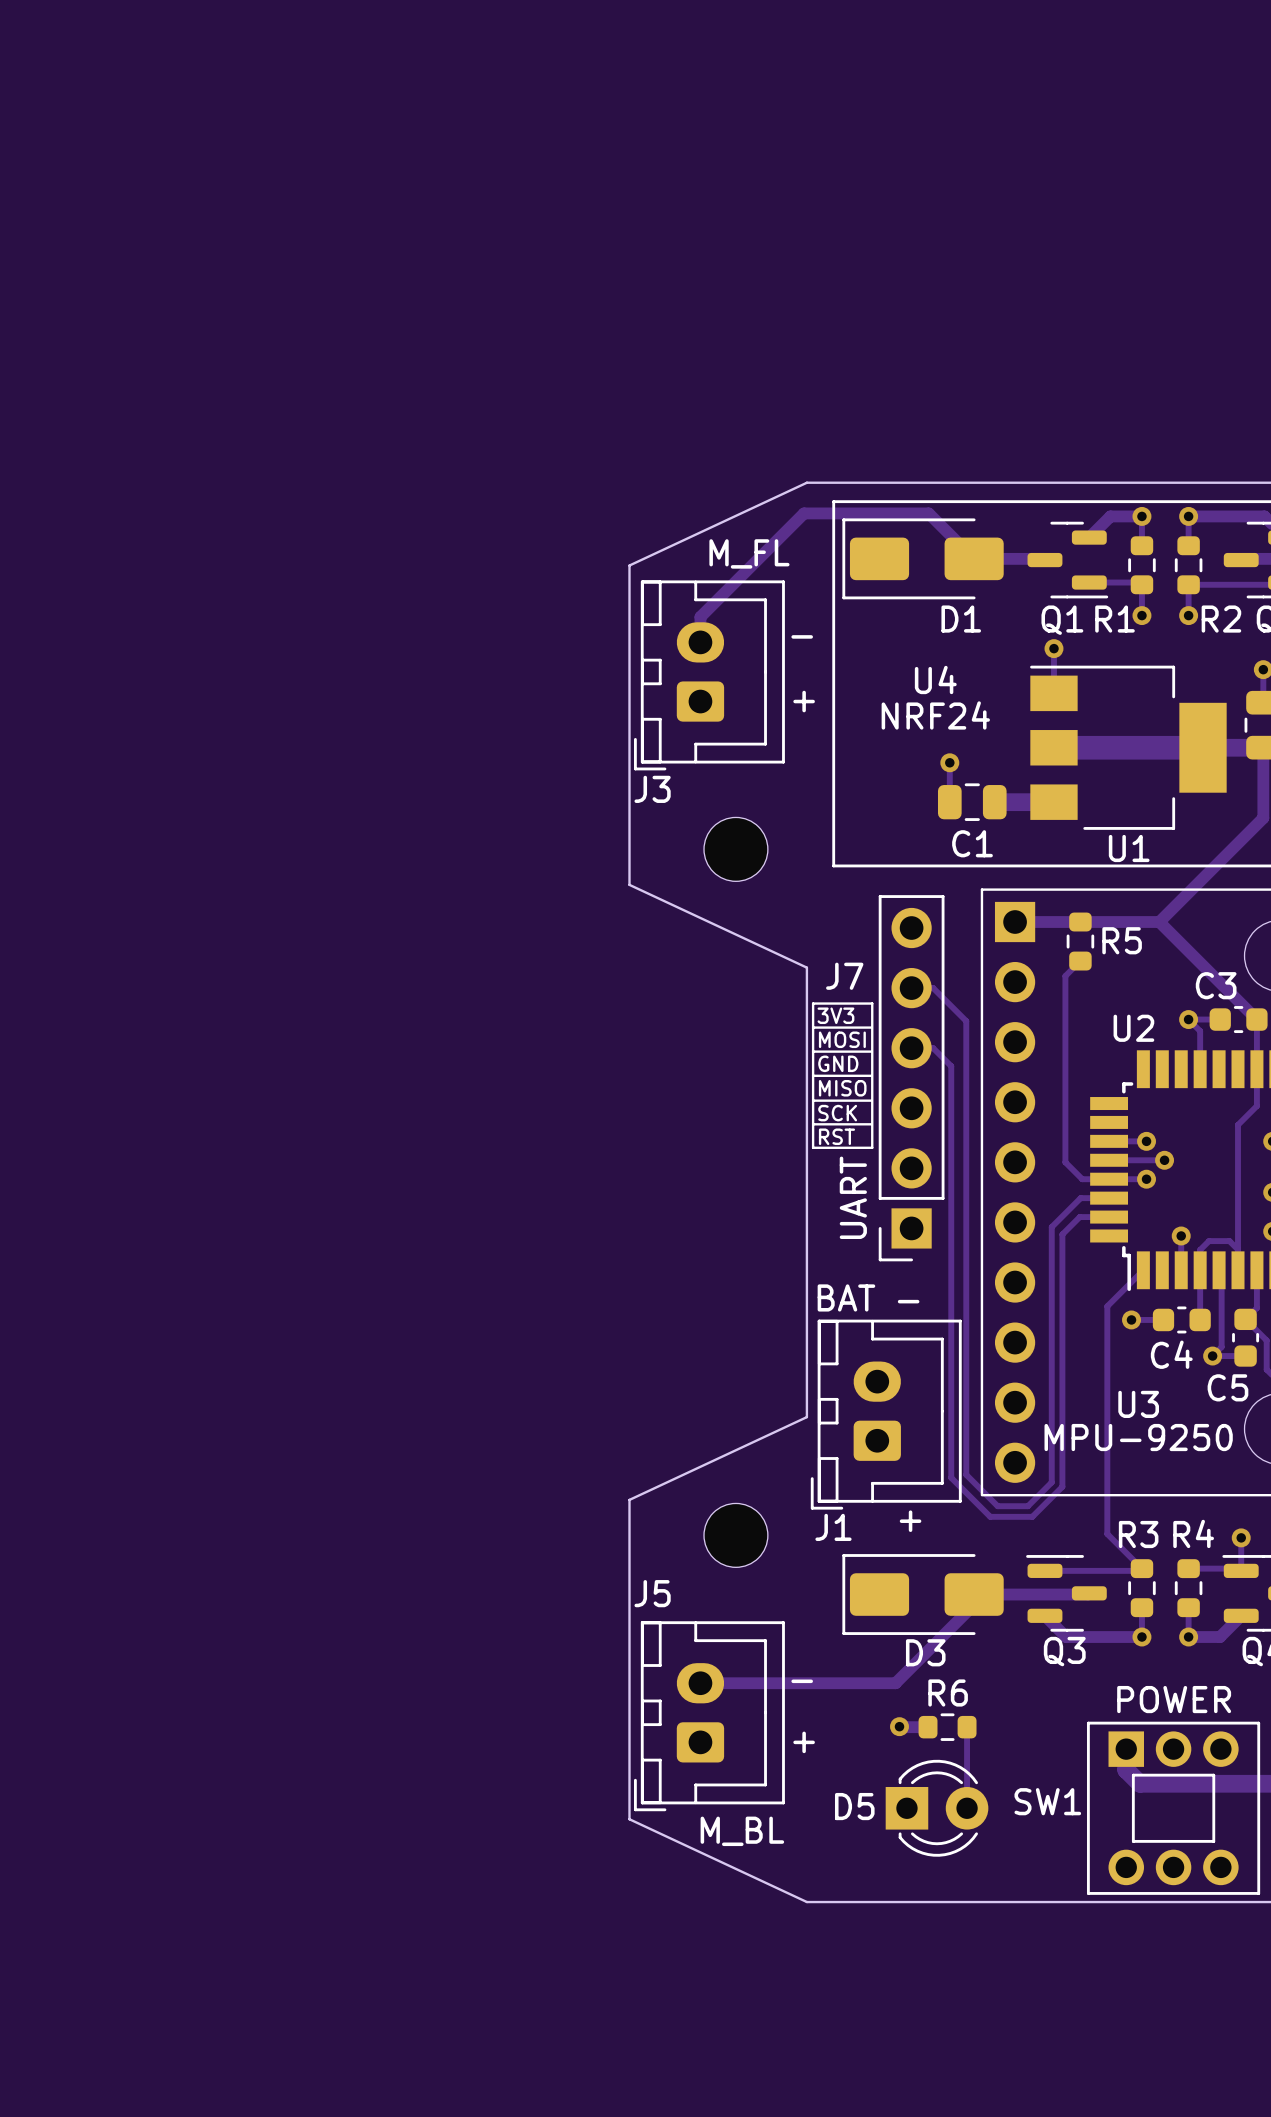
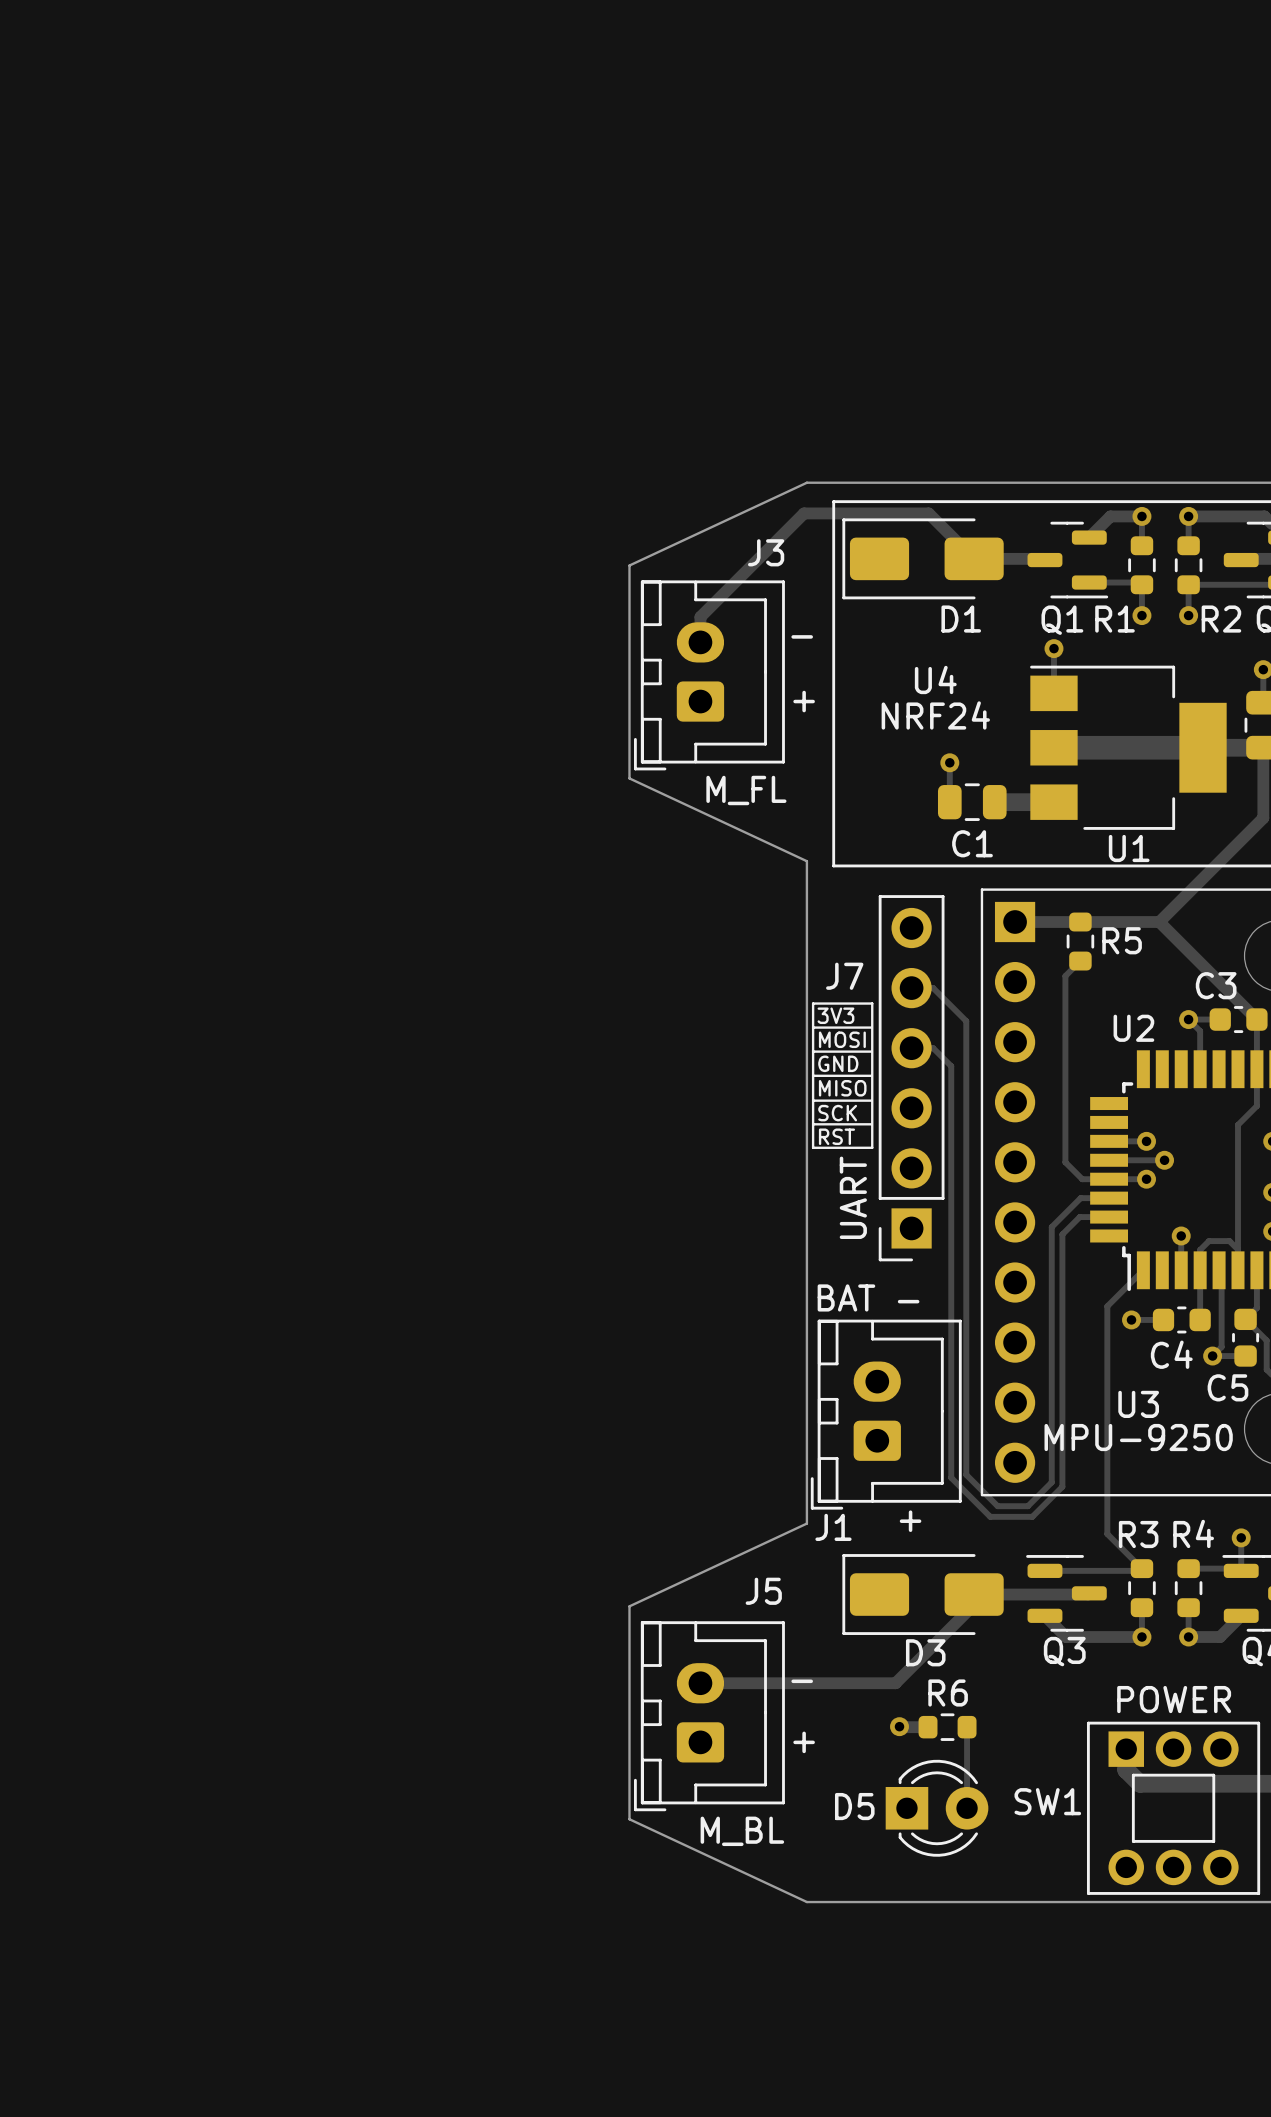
J3 text position: M_FL (749, 553) -> M_FL (746, 790)
board edge: (629, 778) (629, 884) (806, 967) -> (629, 778) (806, 861) (806, 967)
J3 name position: J3 (652, 789) -> J3 (766, 552)
part: (735, 849) -> none
board edge: (806, 1417) (629, 1499) (629, 1606) -> (806, 1417) (806, 1523) (629, 1606)
part: (735, 1535) -> none
J5 name position: J5 (652, 1593) -> J5 (763, 1591)

